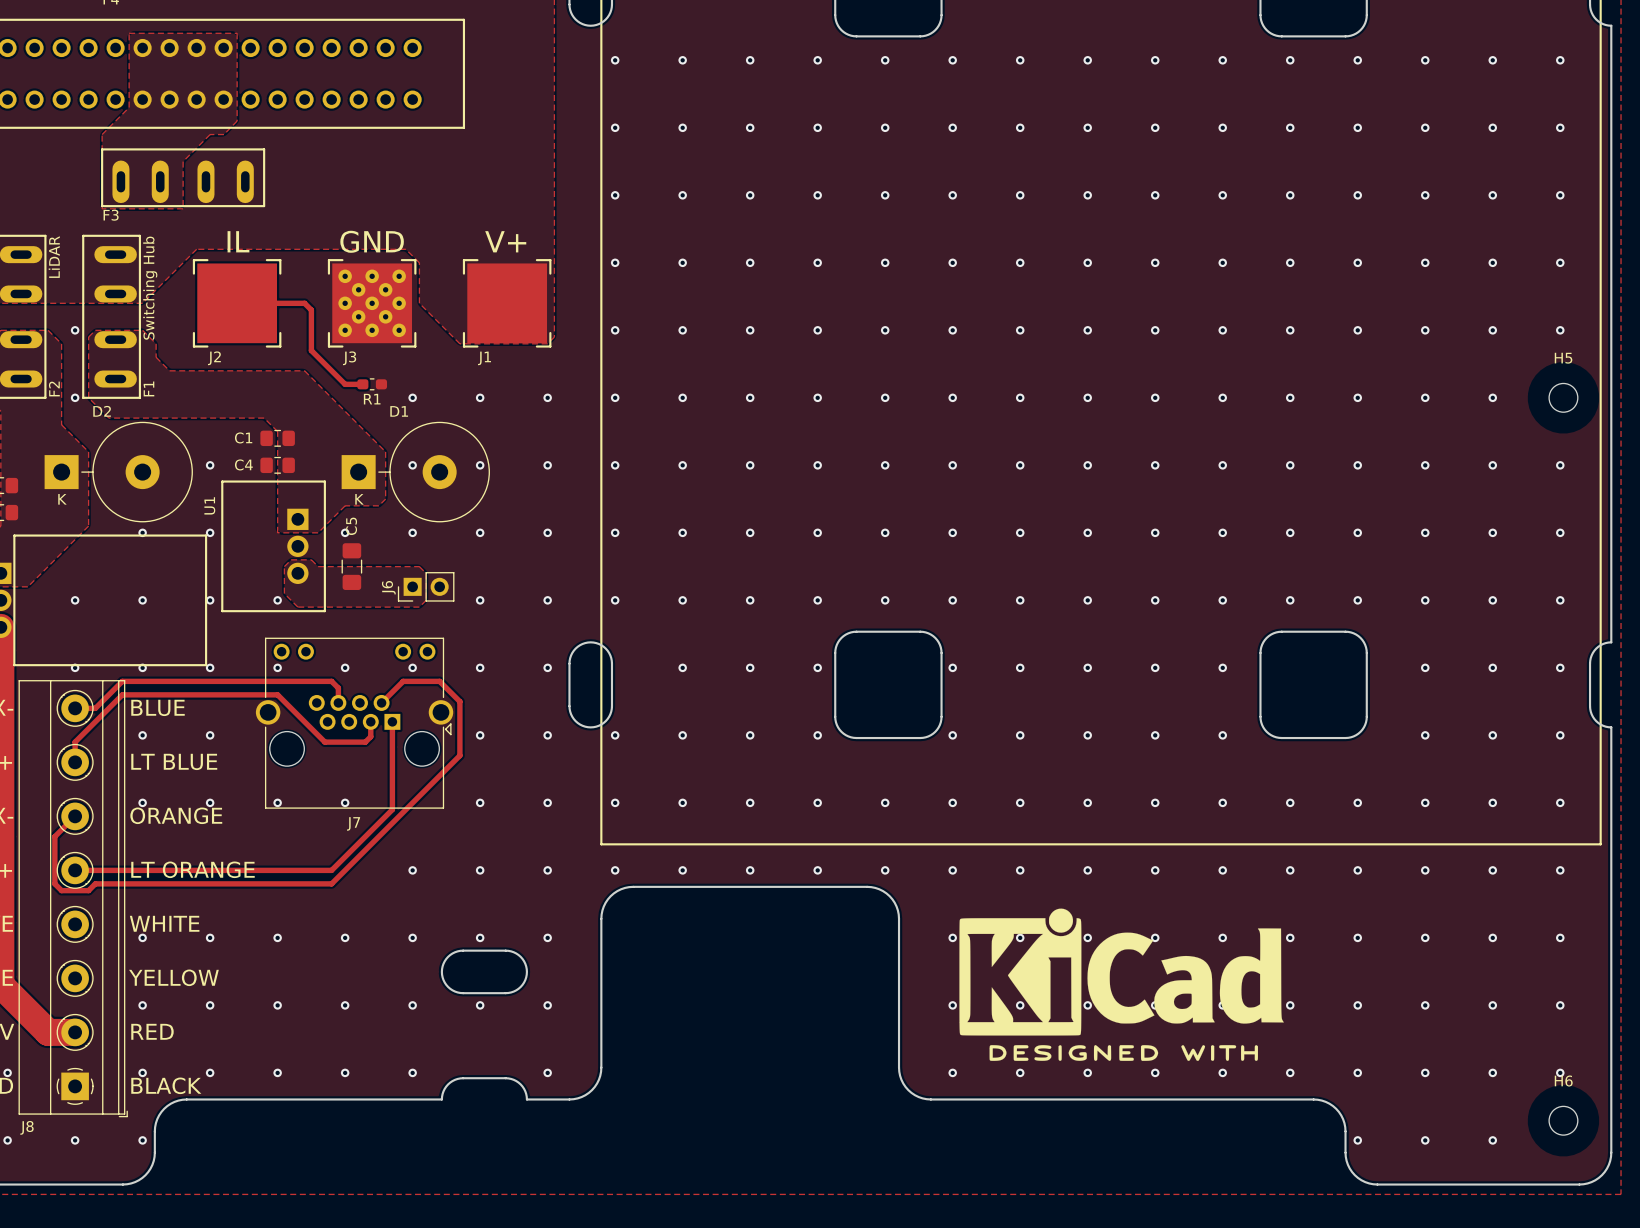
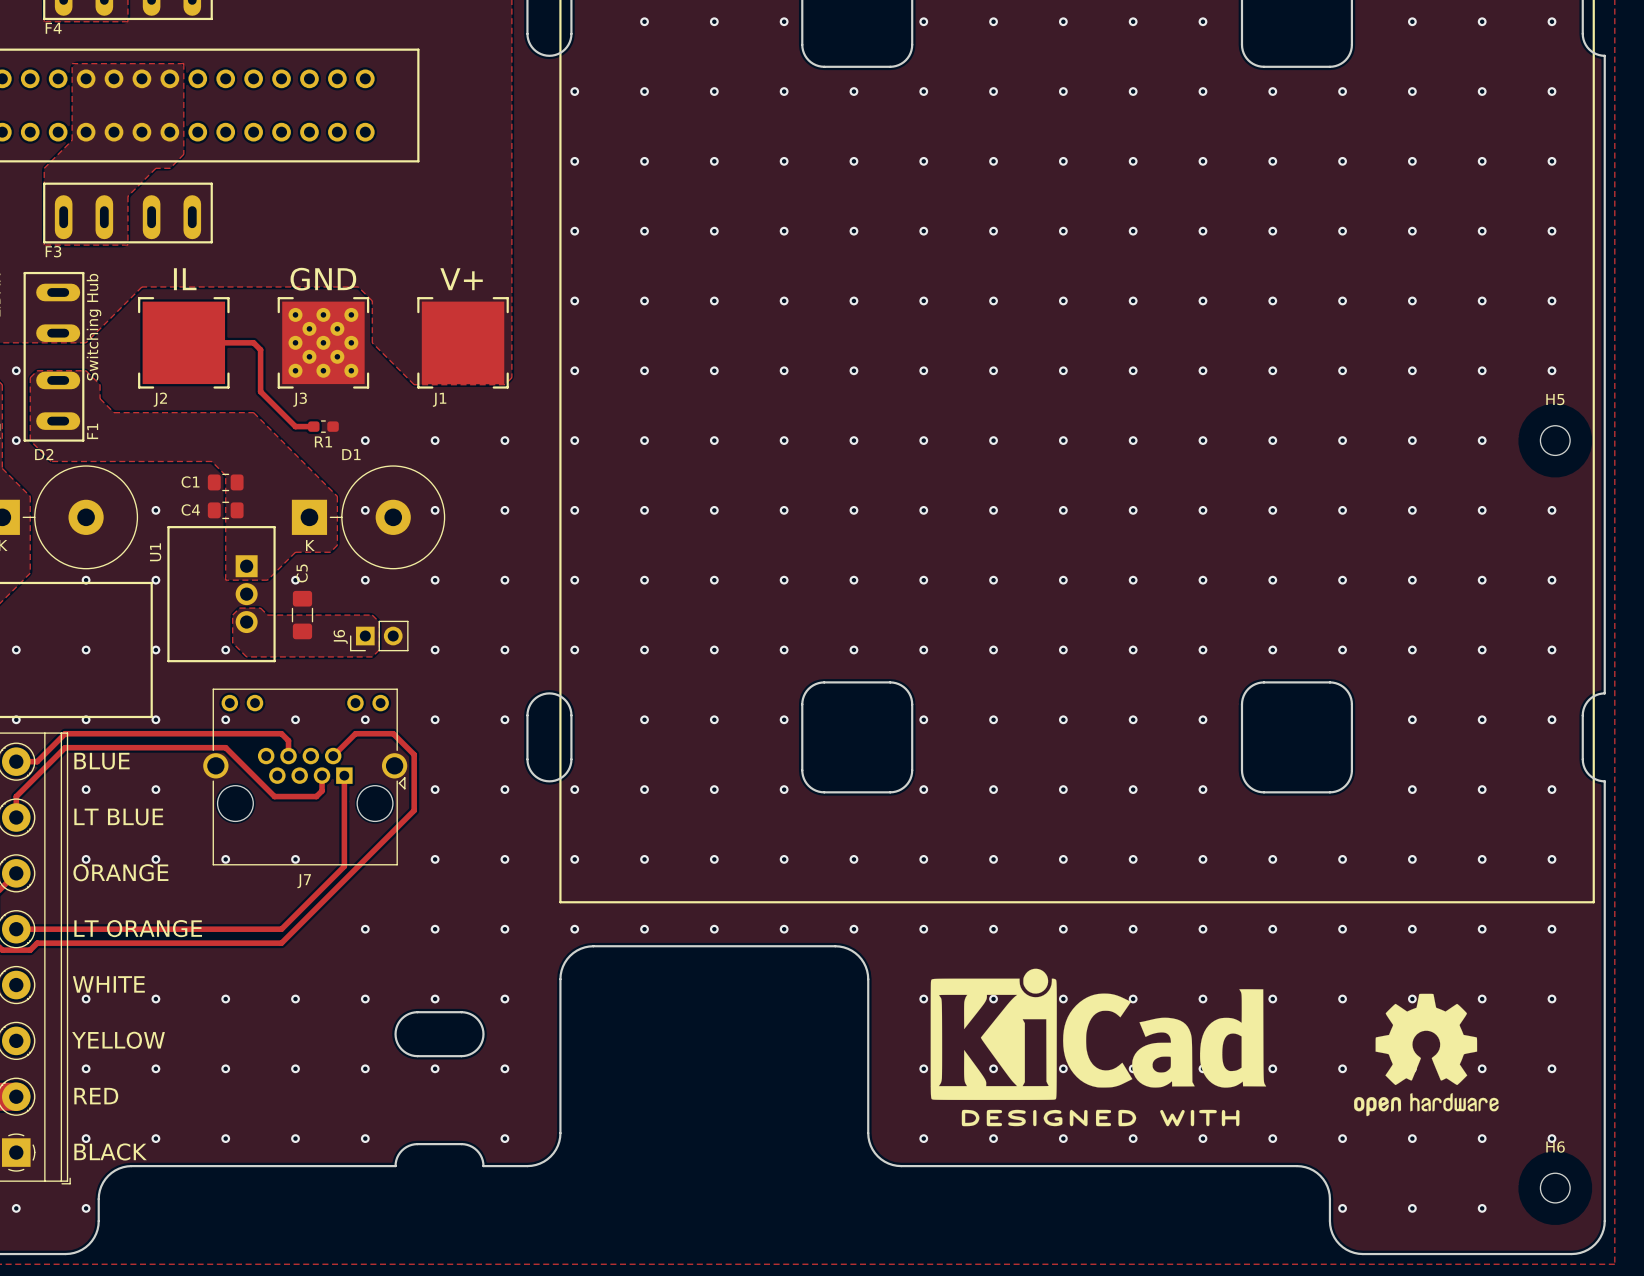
drawing: none -> [1354, 993, 1499, 1117]

